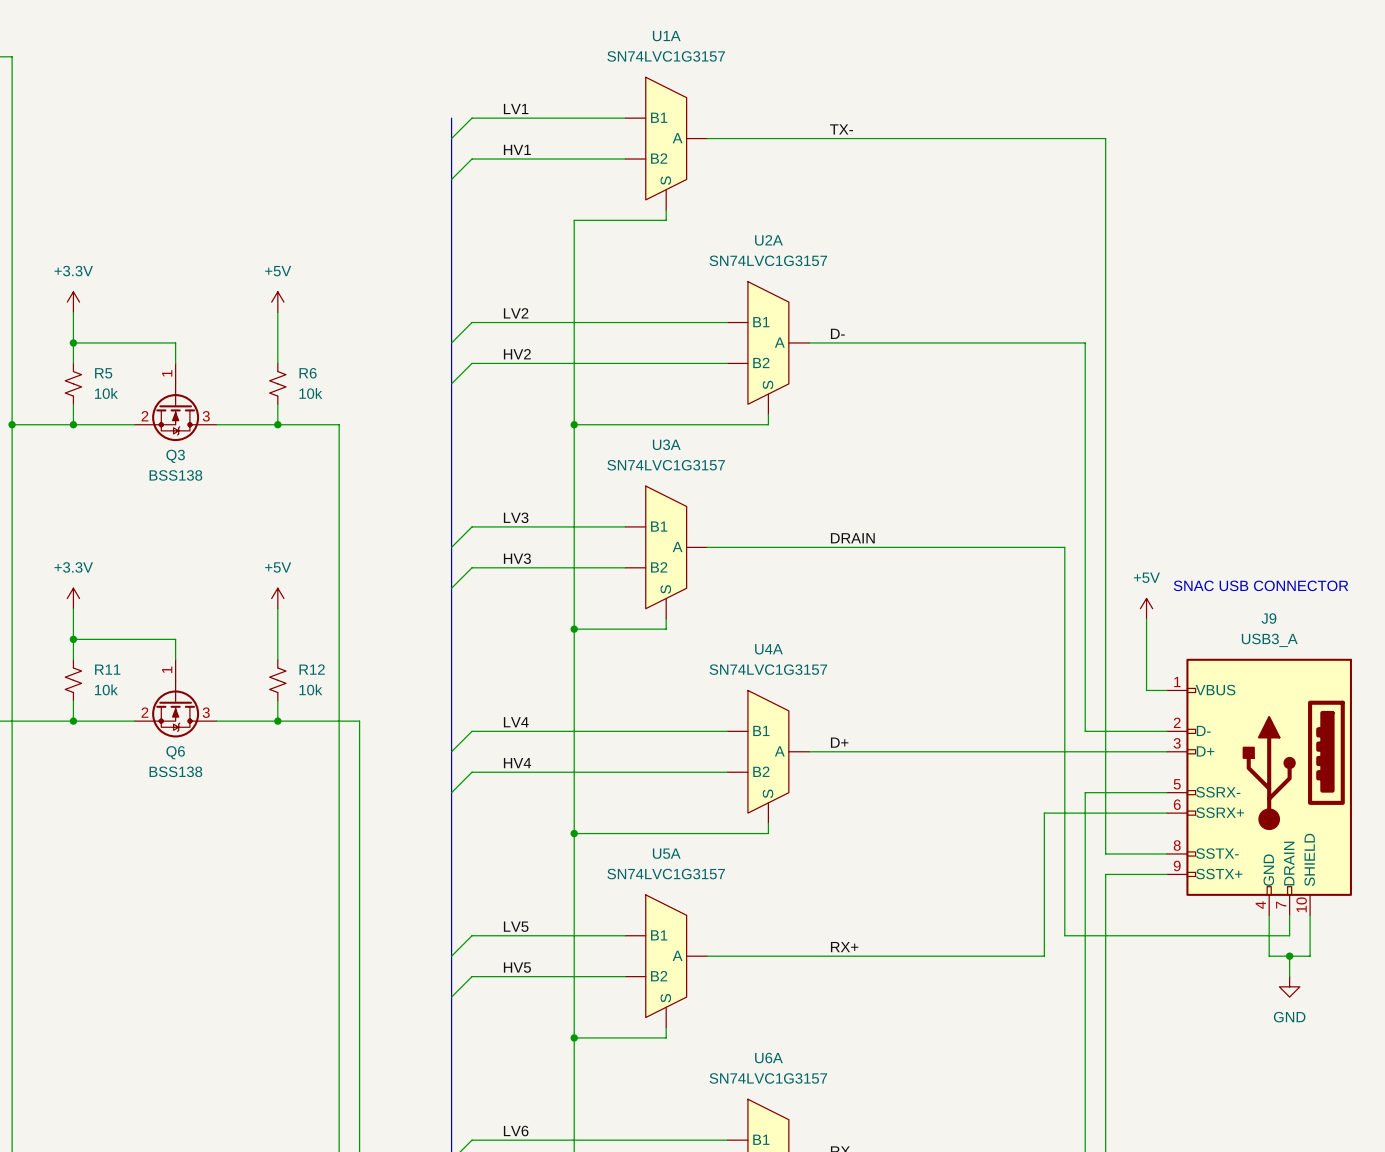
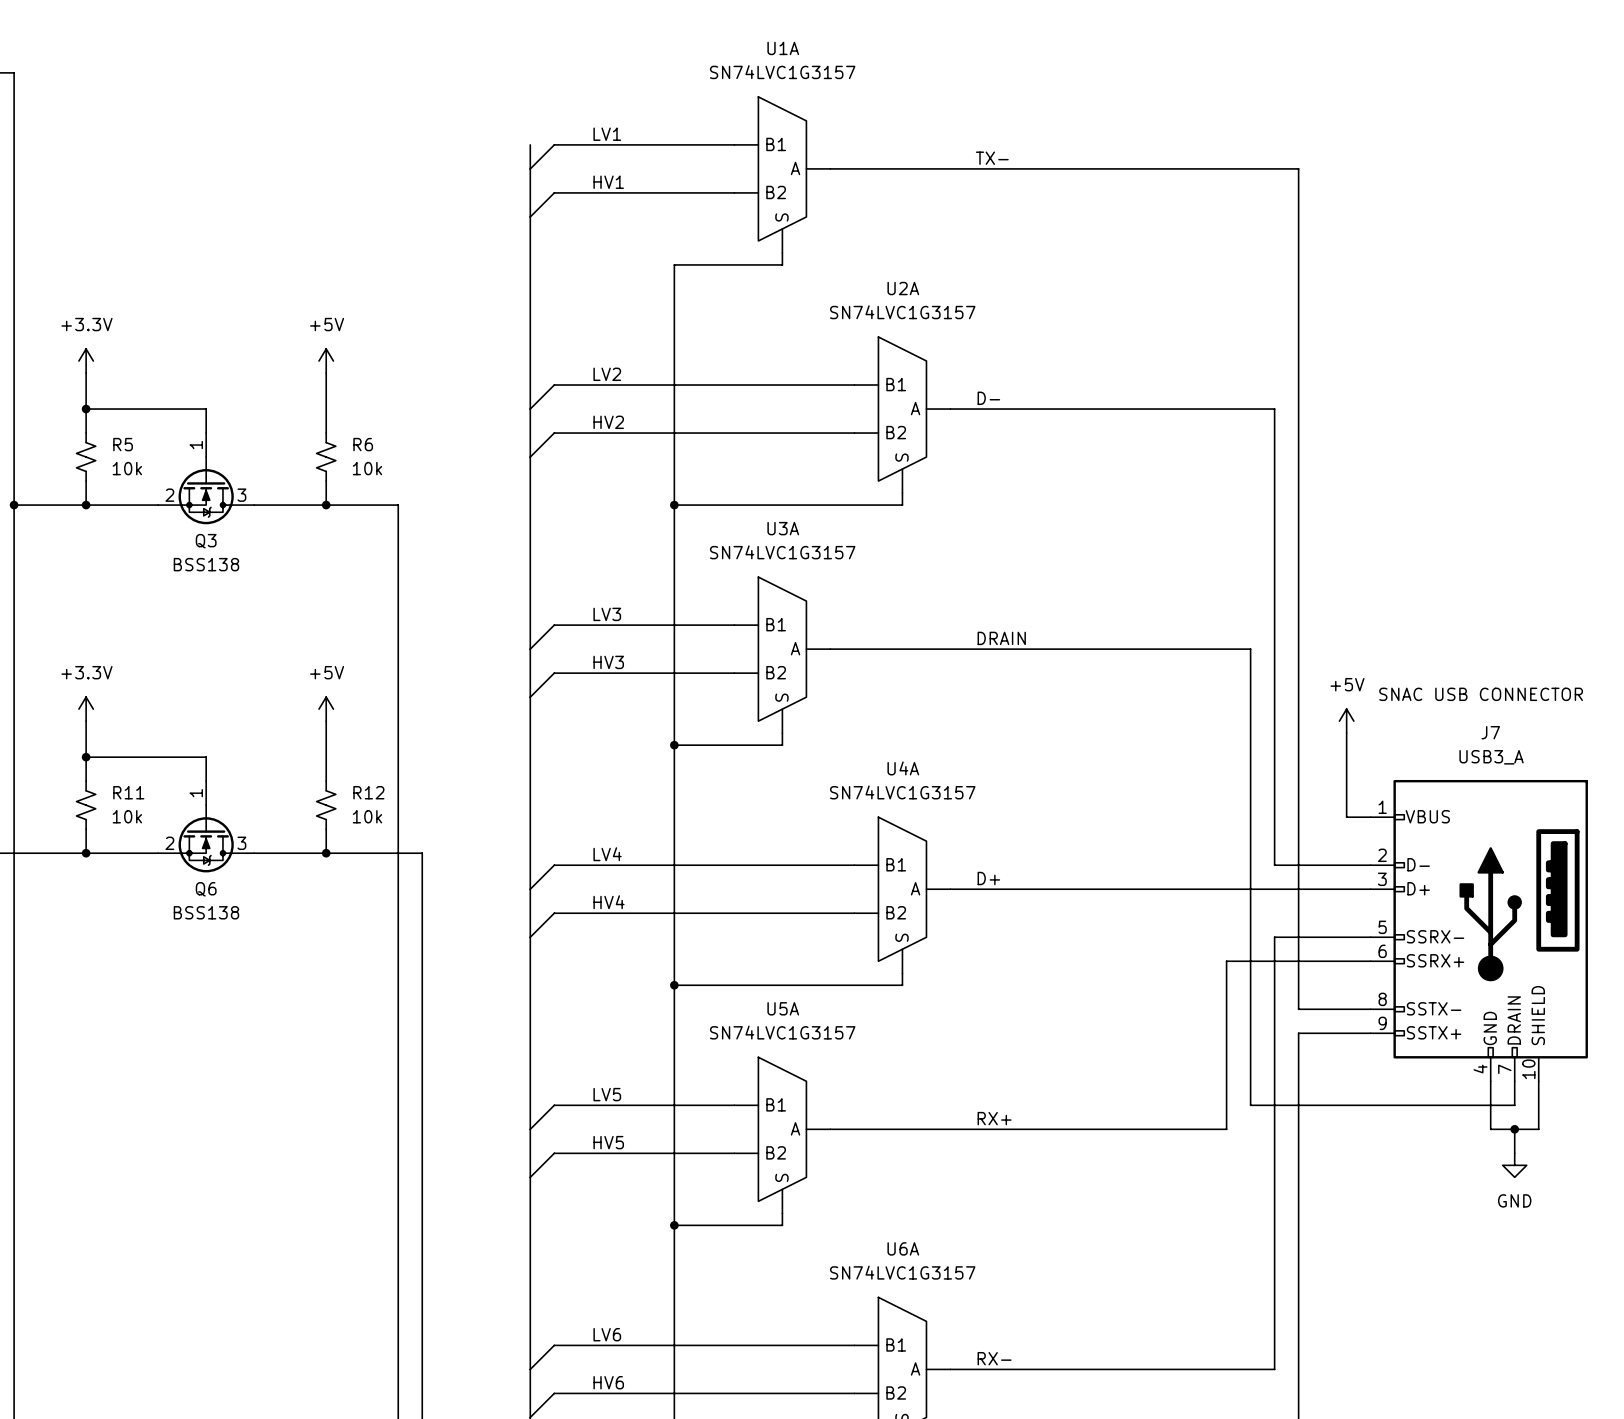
J9 name: J9 (1268, 618) -> J7 (1490, 732)

